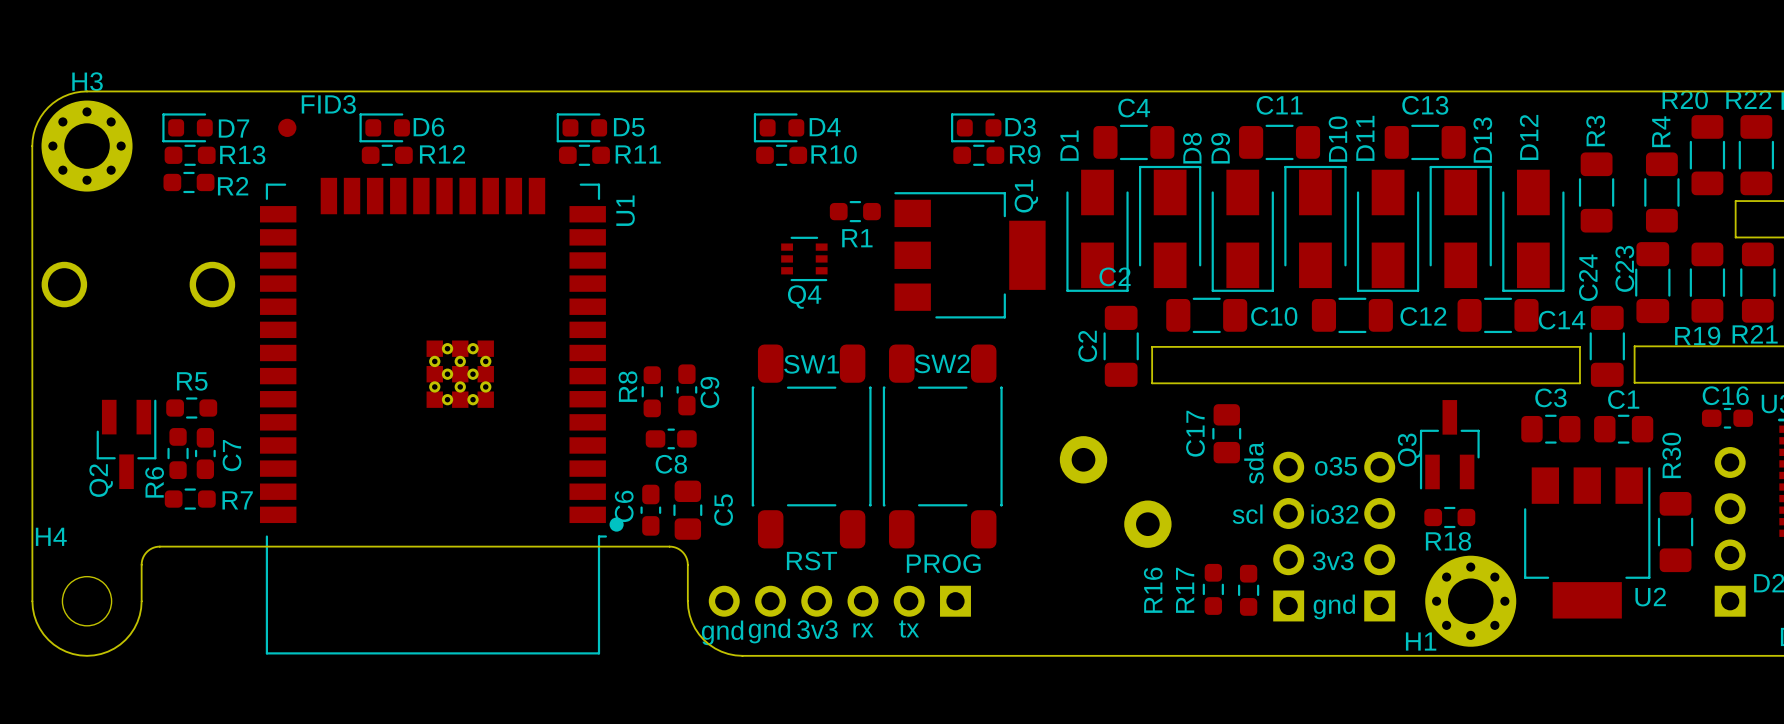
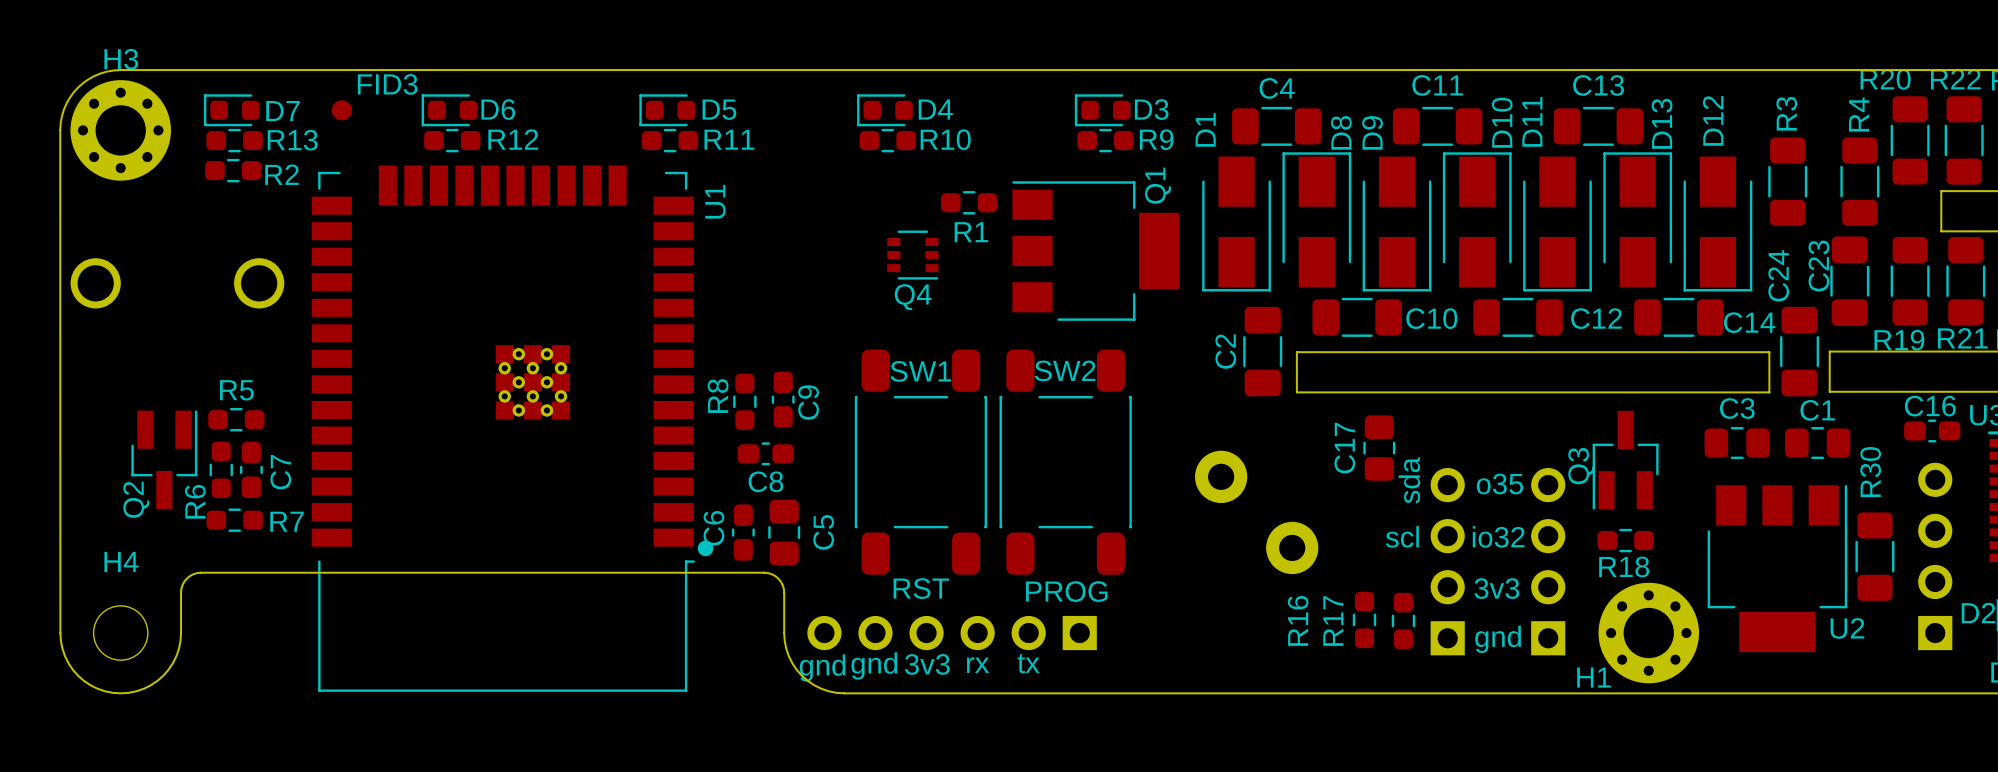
text: C2 (1115, 276) -> none
H4 name position: H4 (51, 536) -> H4 (121, 561)

